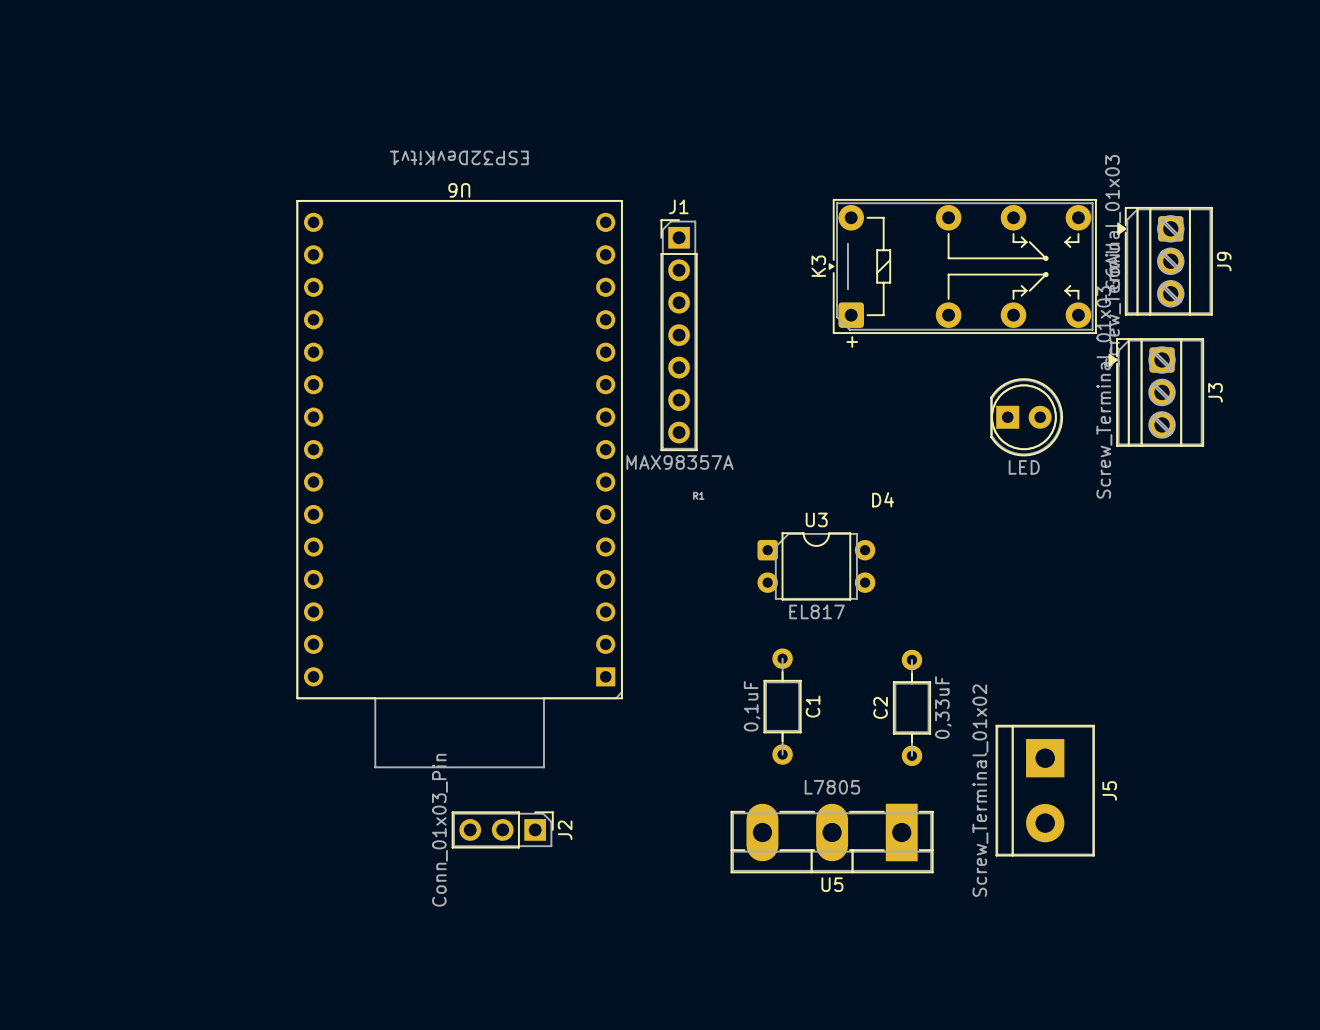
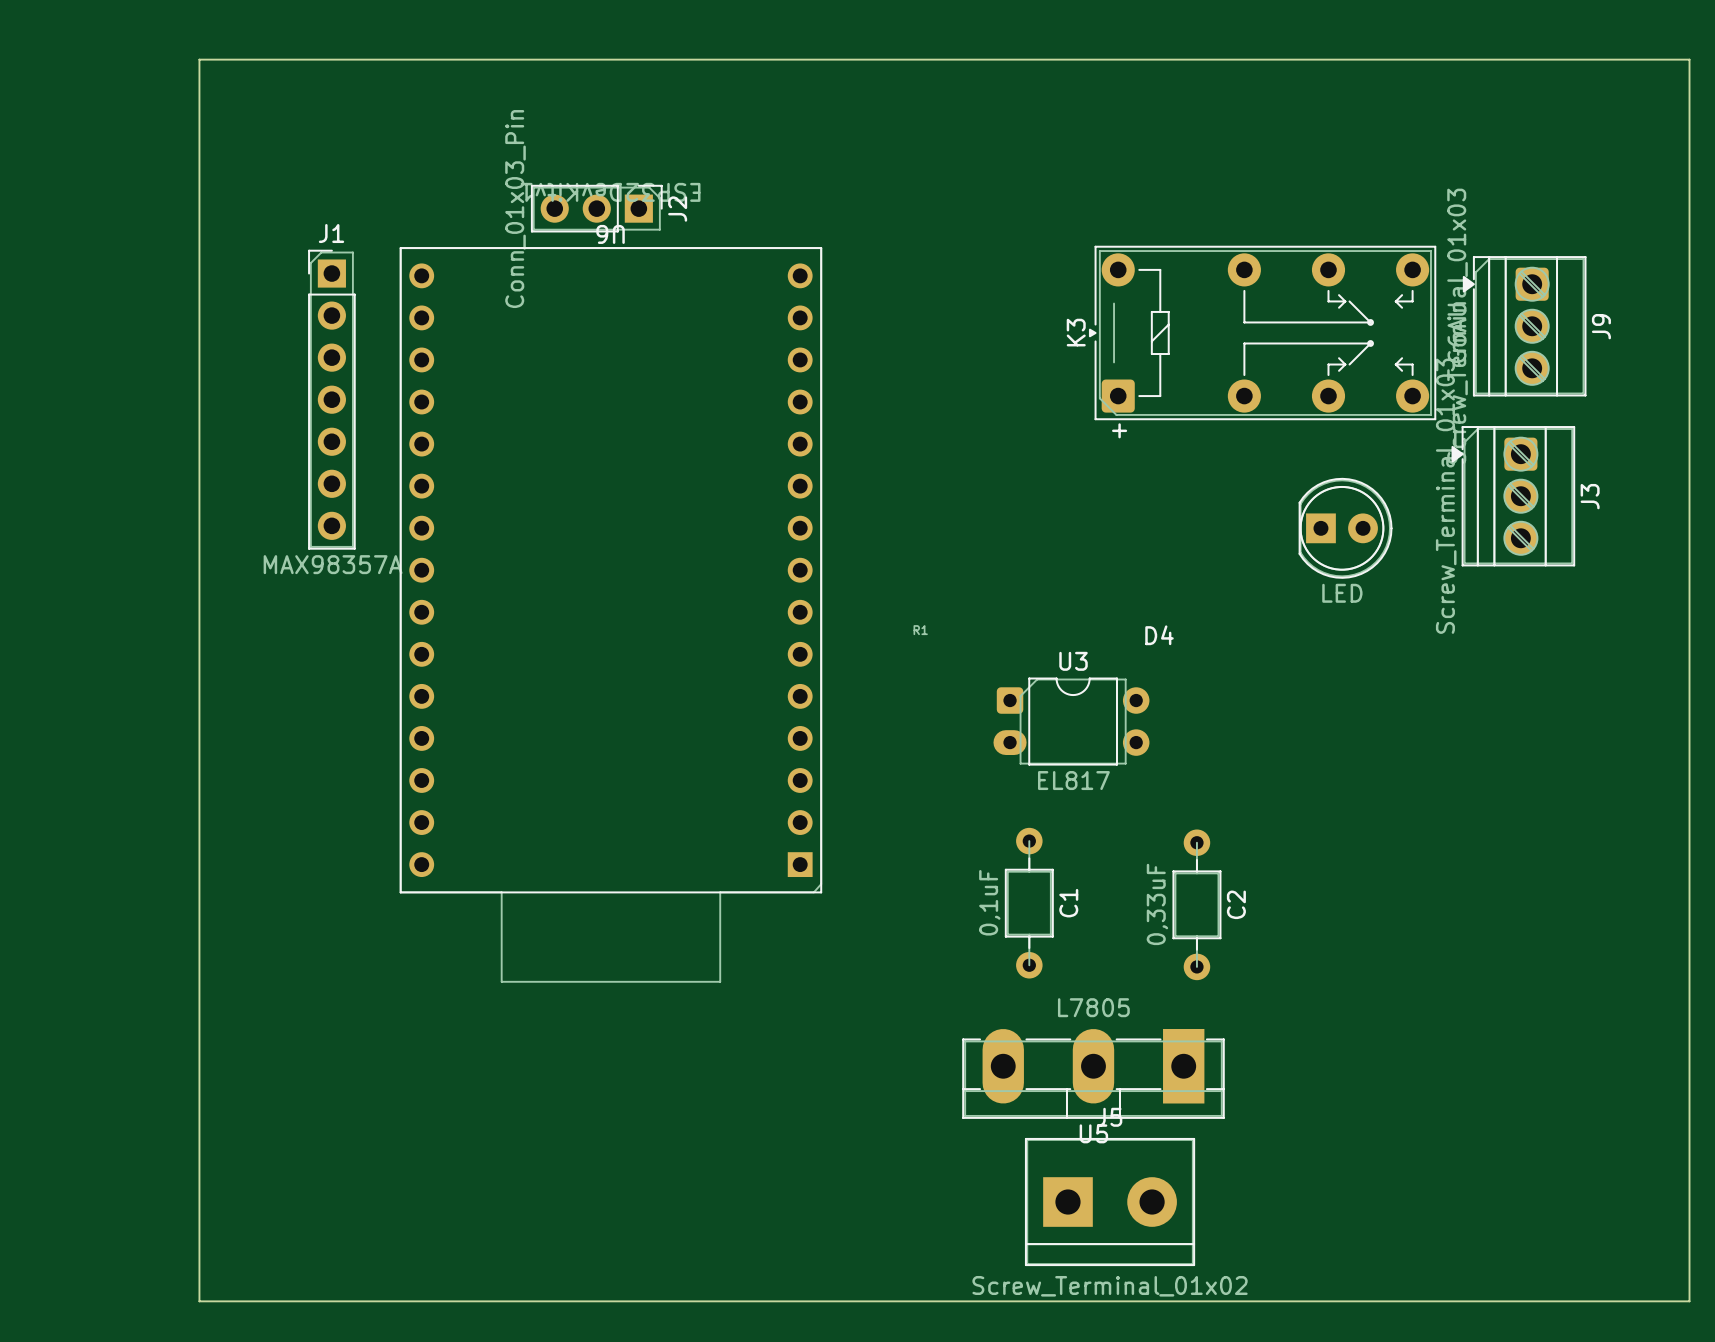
board edge: none -> (199, 59) (1689, 59) (1689, 1301) (199, 1301) (199, 59)
J1 position: (679, 335) -> (331, 399)
U3 footprint: [757, 532, 876, 601] -> [993, 677, 1150, 766]
C2 name position: C2 (880, 707) -> C2 (1236, 904)
C2 value position: 0,33uF (943, 707) -> 0,33uF (1157, 904)
J5 rotation: 0° (1045, 790) -> 90° counterclockwise (1110, 1202)
J5 position: (1045, 790) -> (1110, 1202)
J2 position: (502, 829) -> (596, 208)

